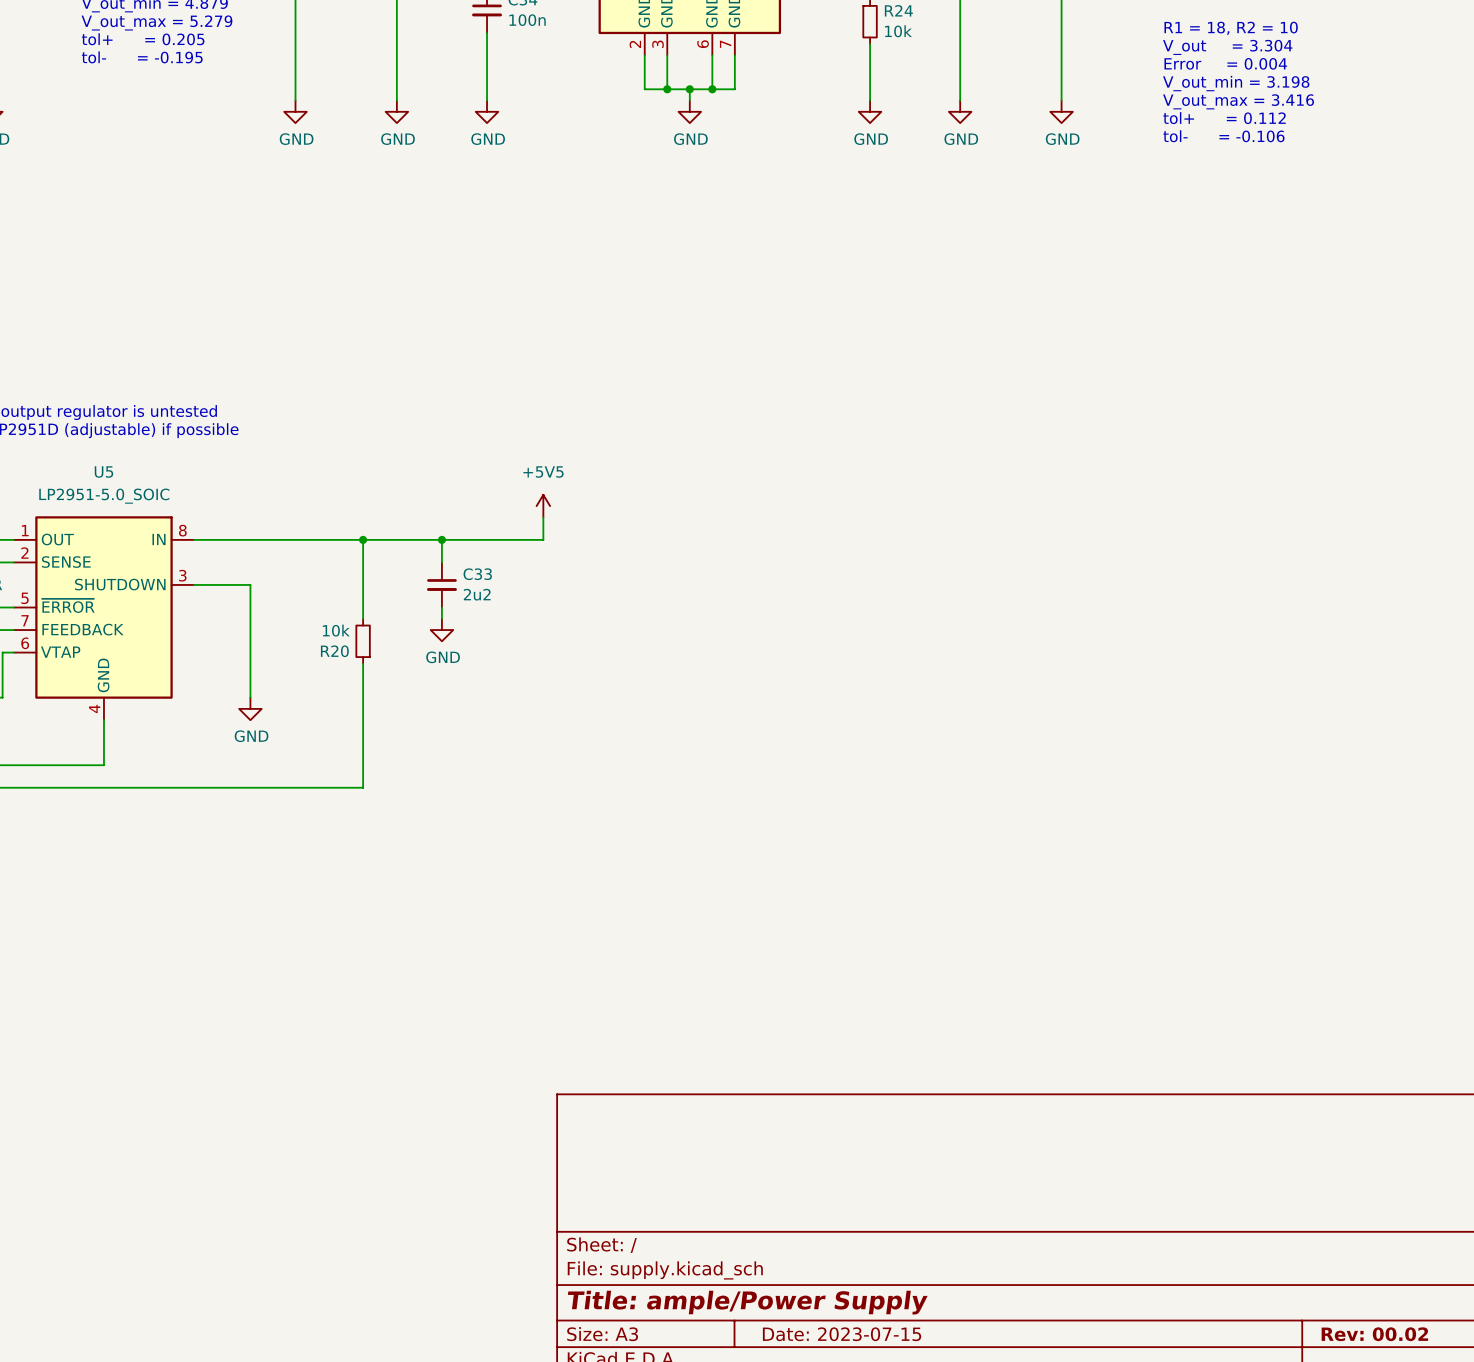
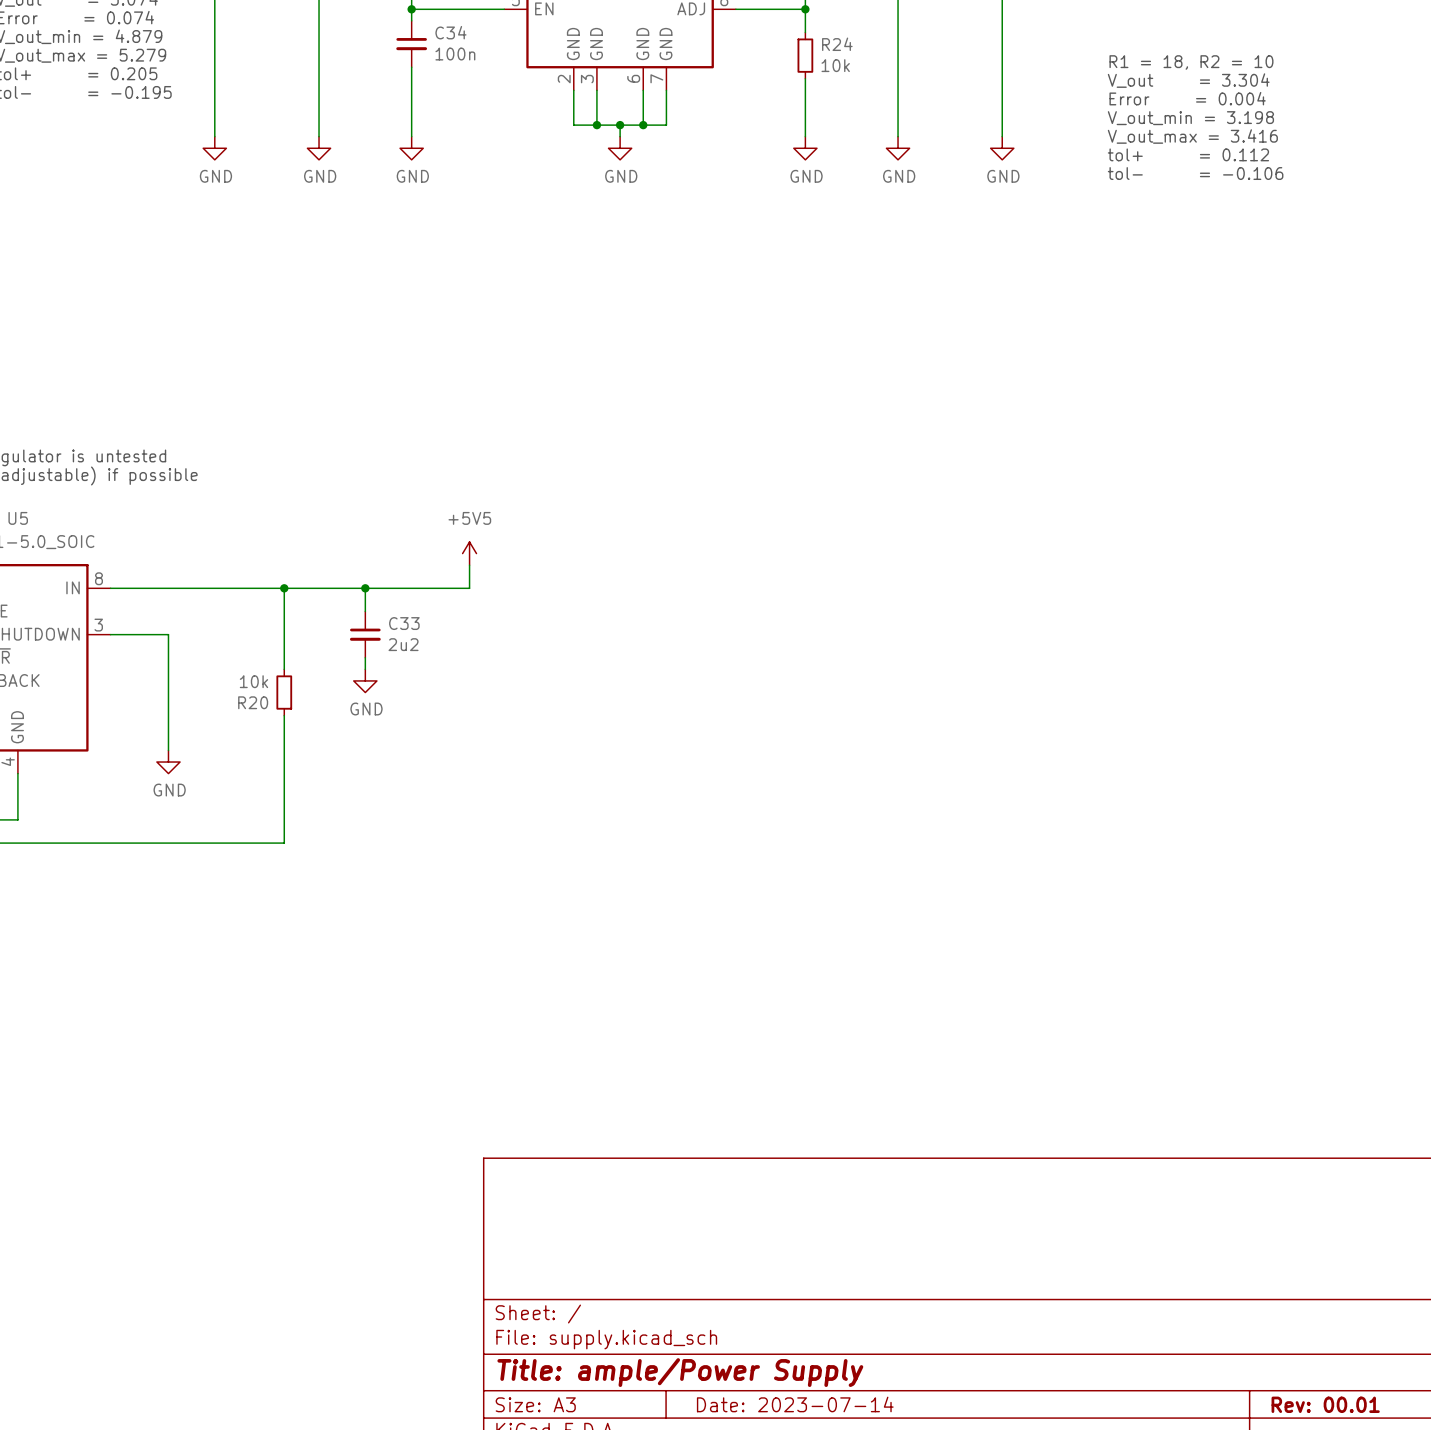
title block: Date: 2023-07-15 (842, 1334) -> Date: 2023-07-14 (795, 1404)
title block: Rev: 00.02 (1374, 1334) -> Rev: 00.01 (1325, 1404)

